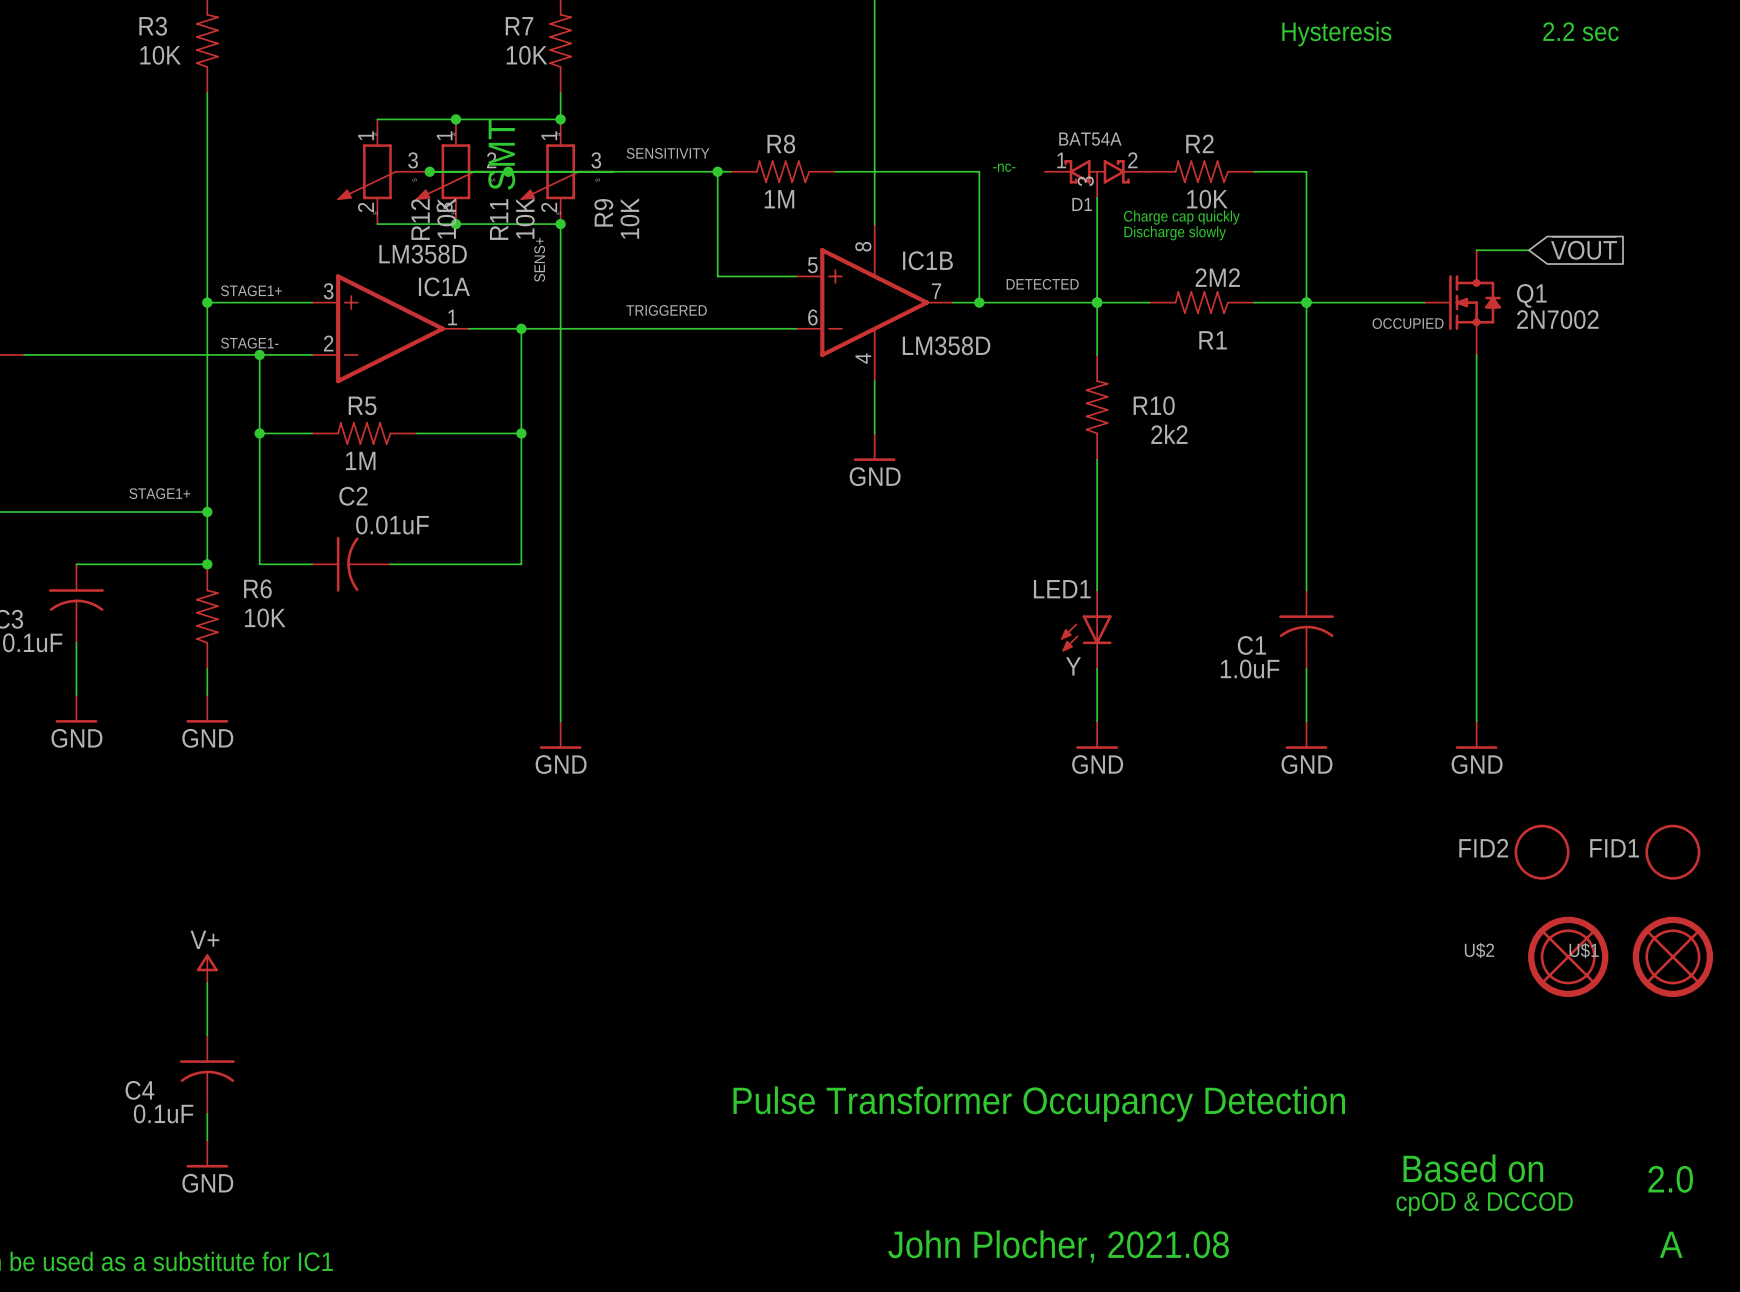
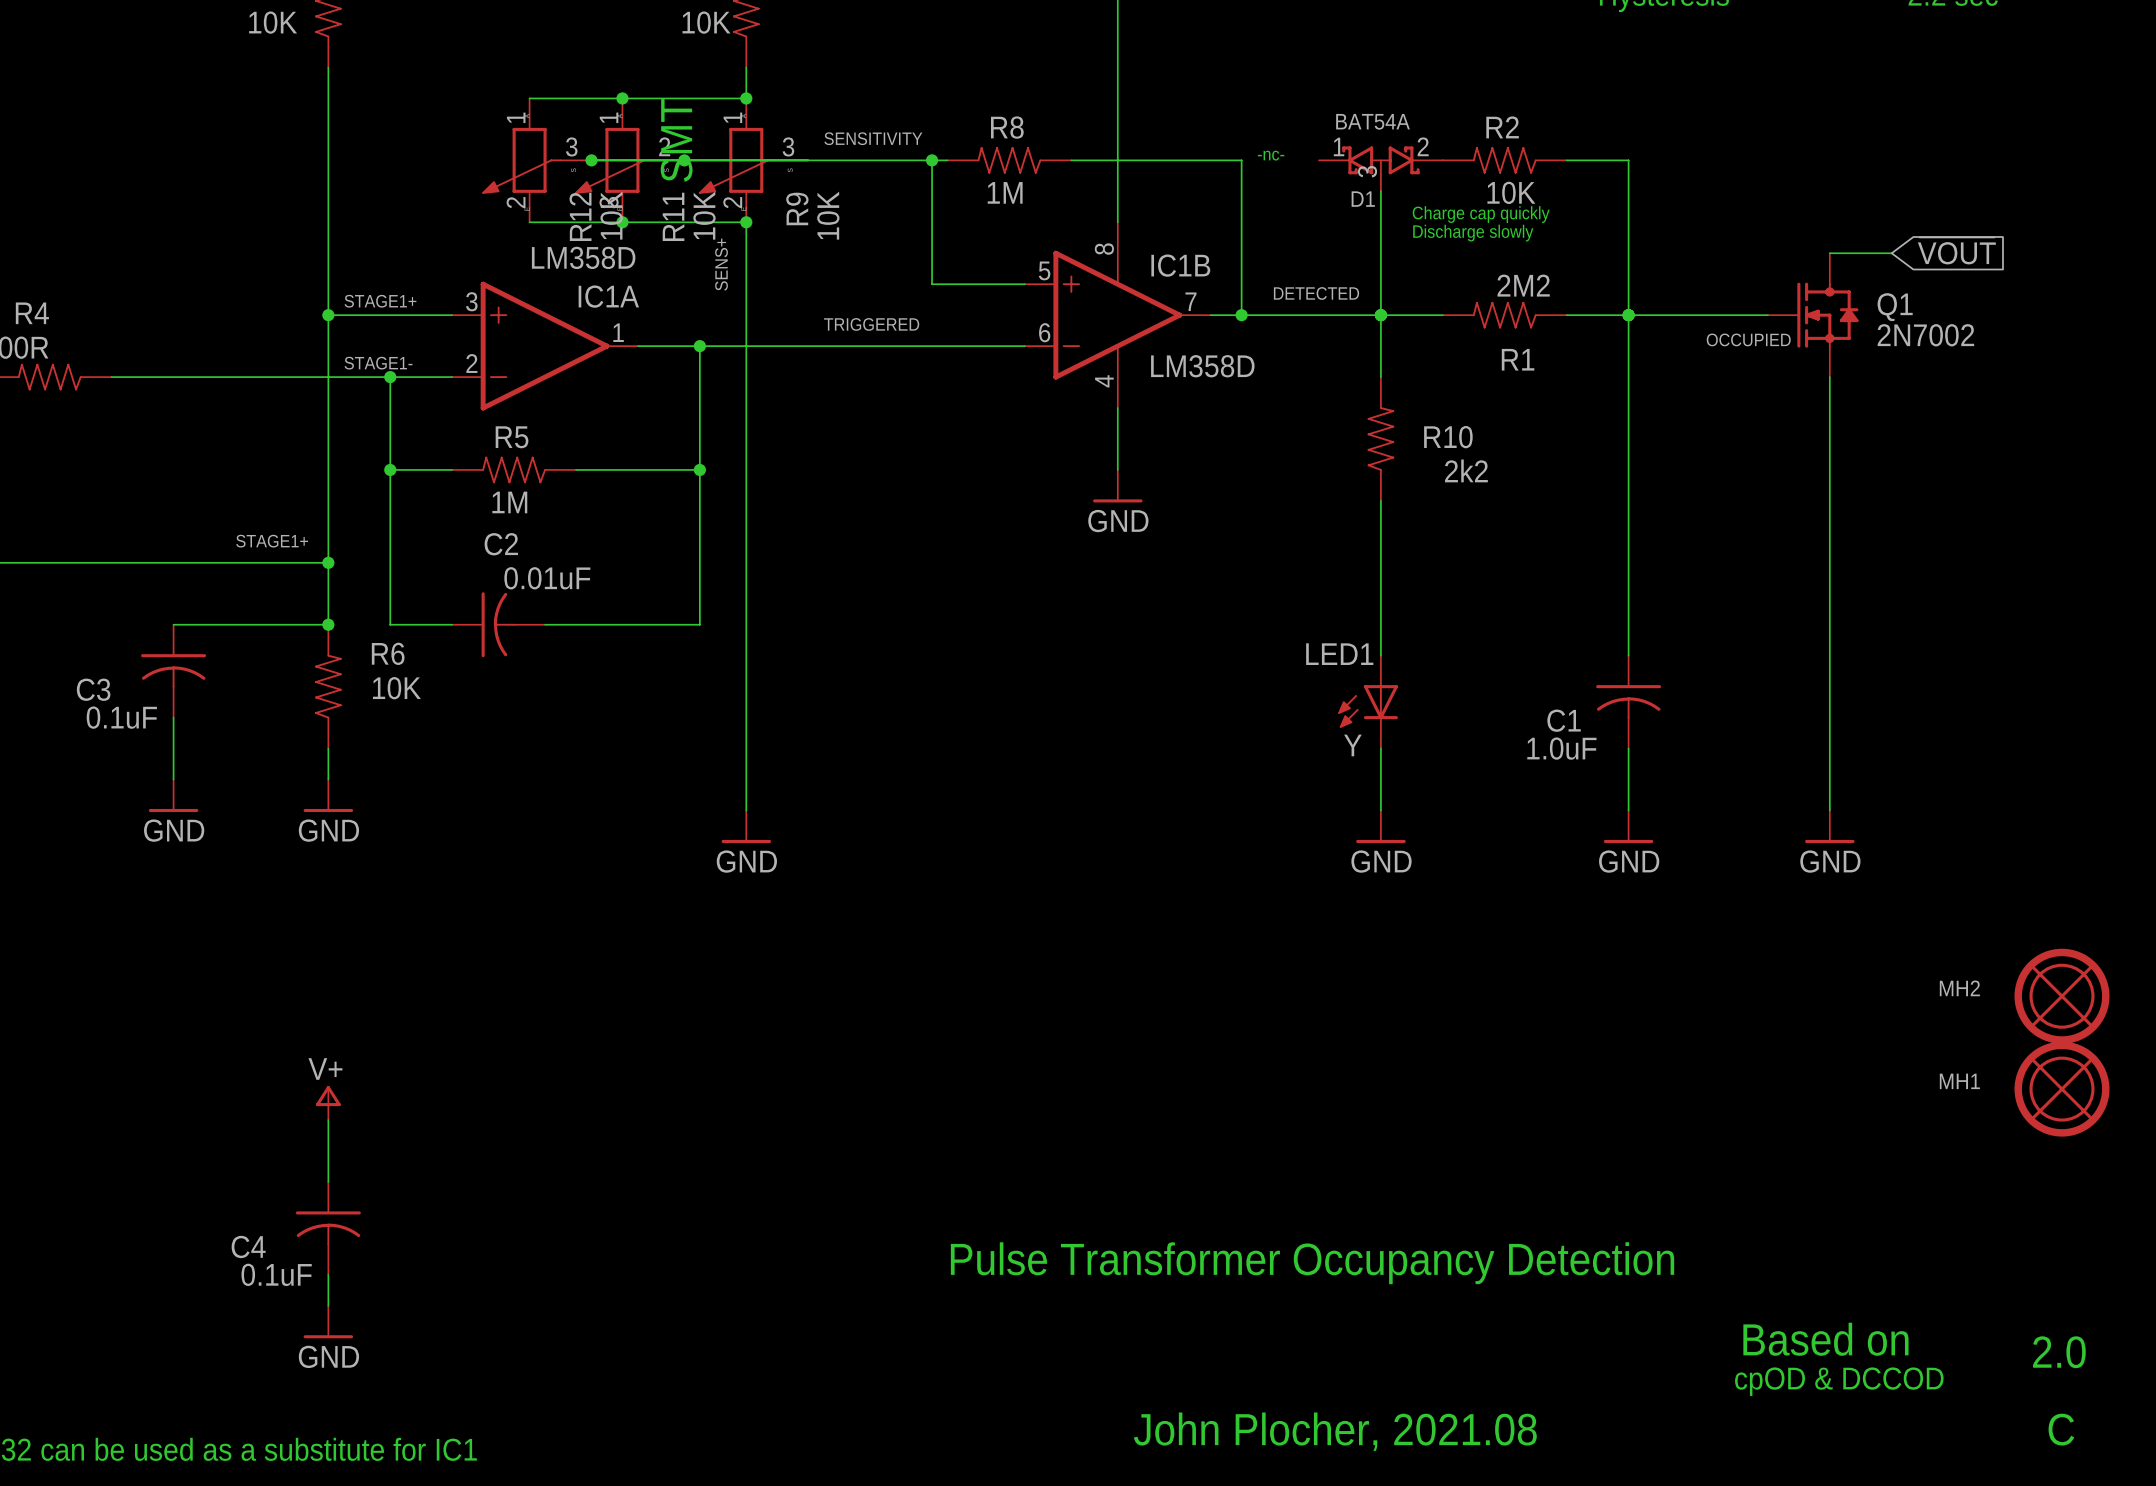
FID2: (1542, 852) -> none
FID1: (1672, 852) -> none
MH2: none -> (2062, 996)
U$1 name: U$1 (1584, 950) -> MH1 (1959, 1081)
U$2: (1568, 956) -> none
text: A (1671, 1244) -> C (2061, 1429)

